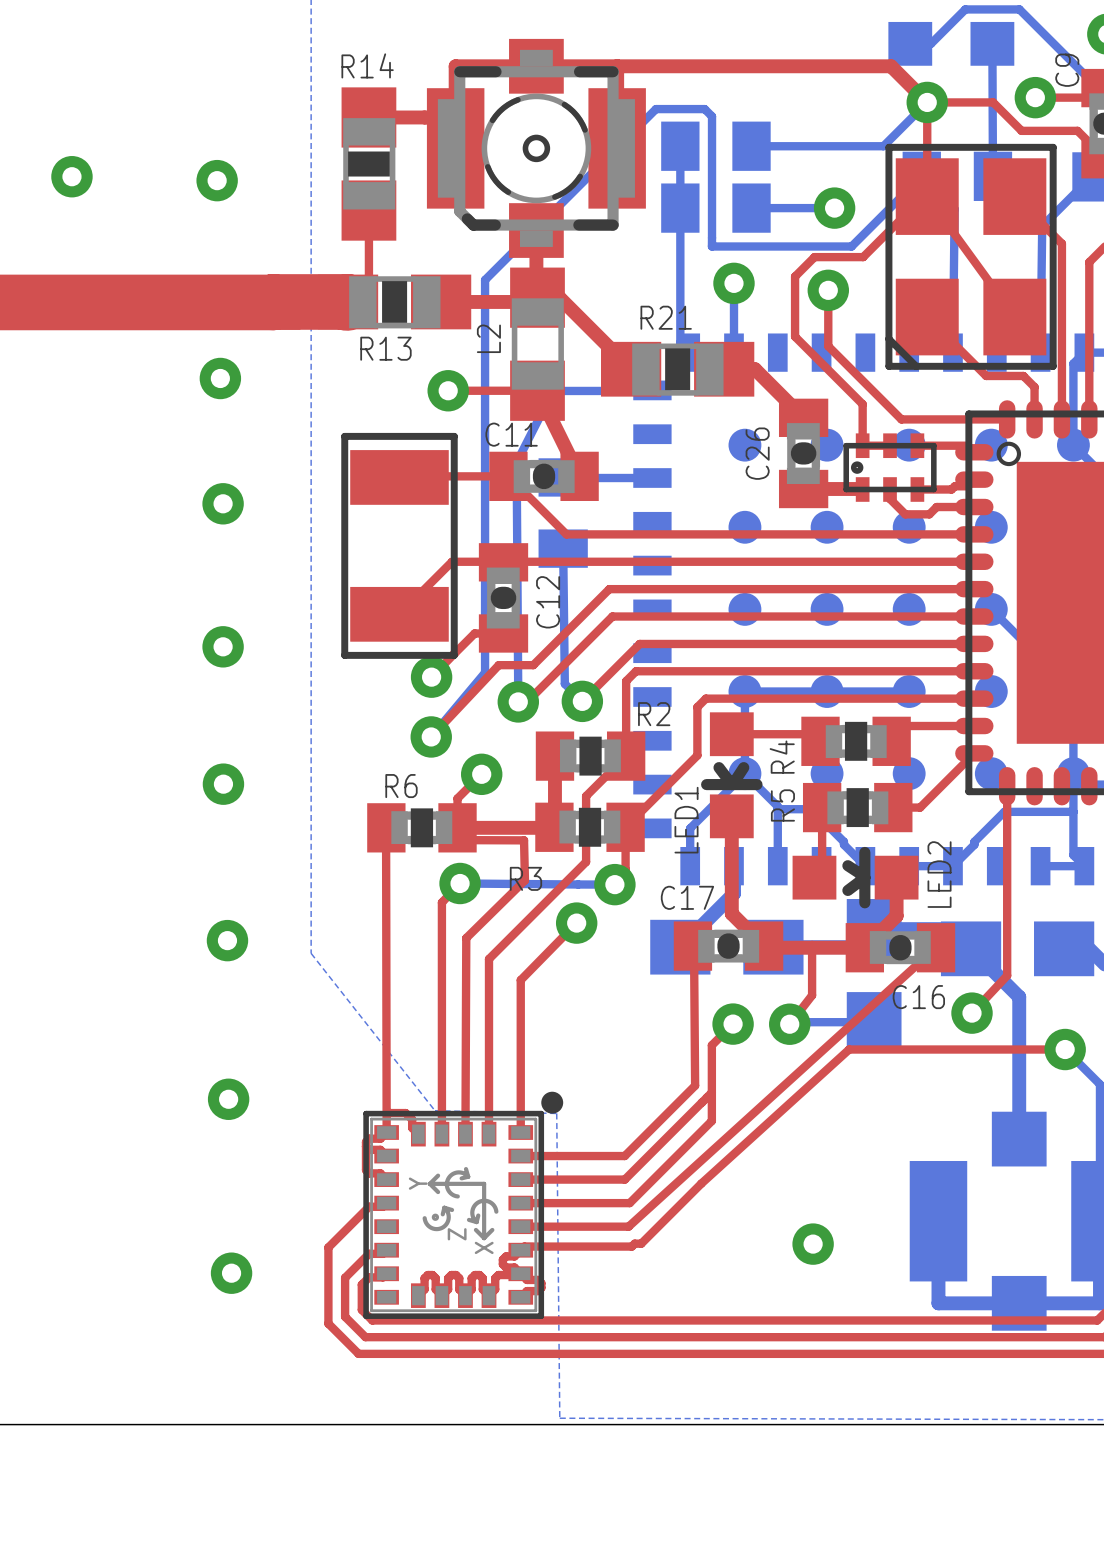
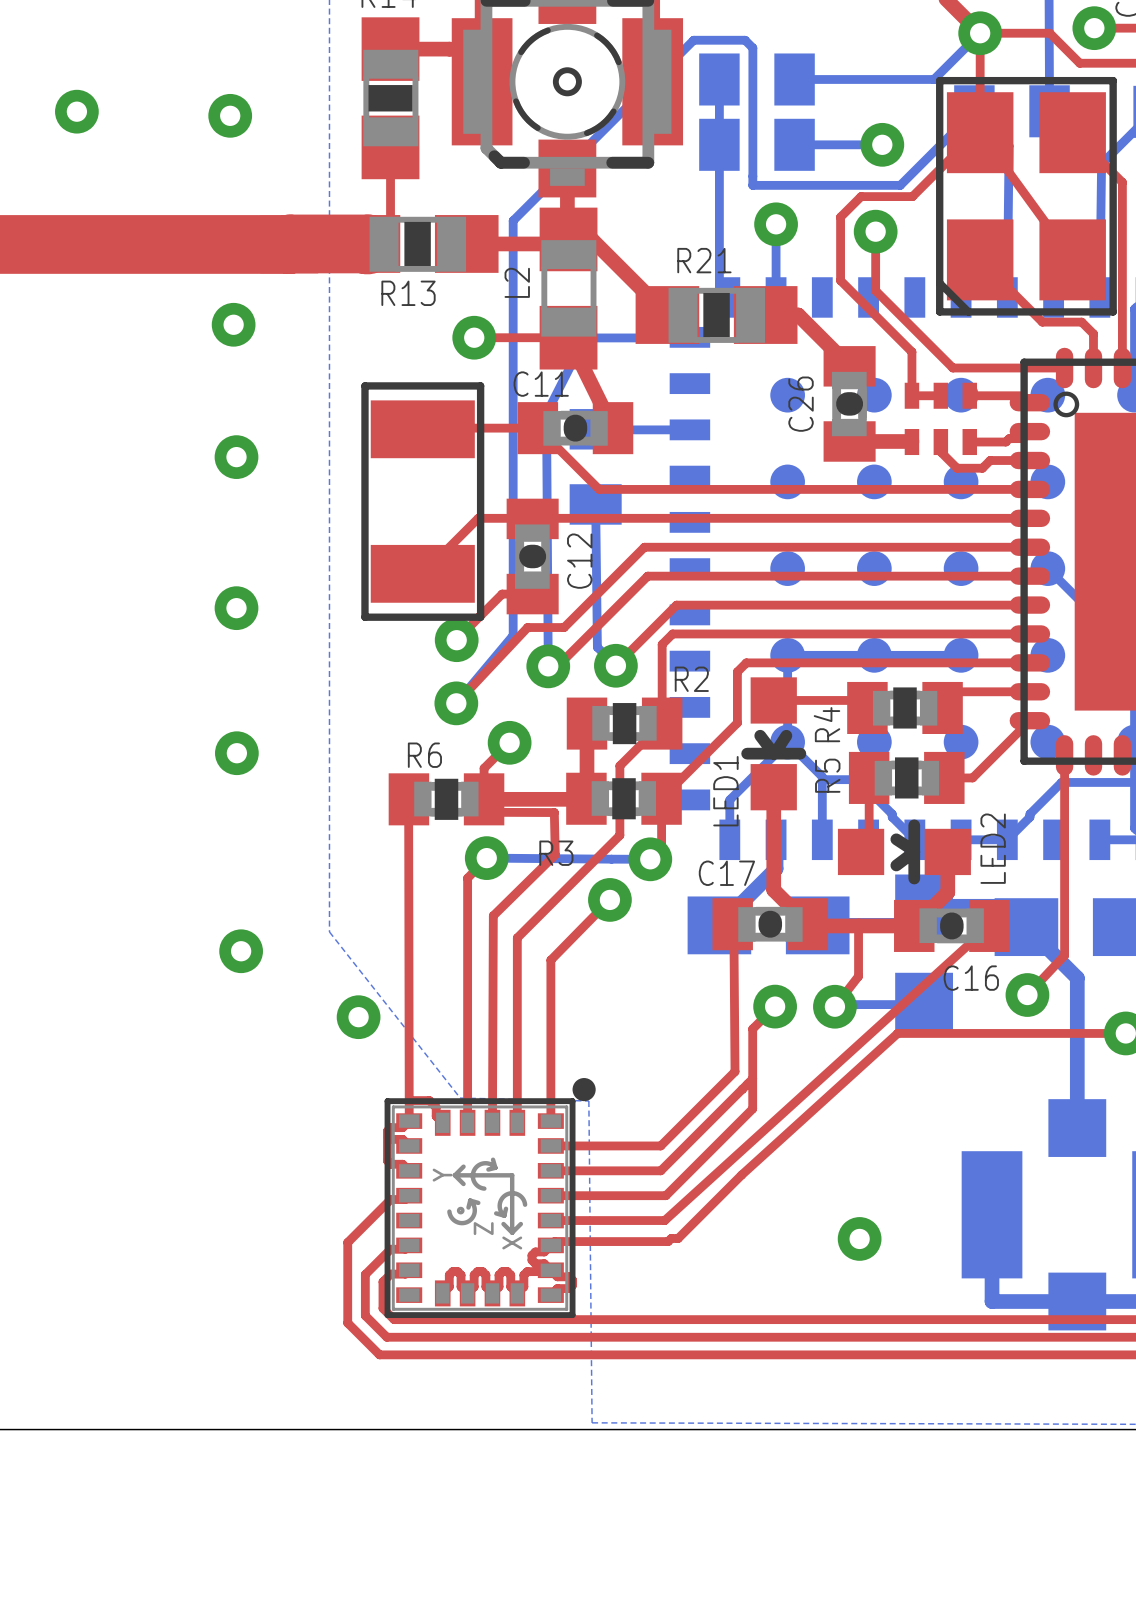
part footprint: [843, 433, 937, 502] -> [904, 382, 977, 456]
via position: (227, 940) -> (241, 951)
via: none -> (358, 1017)
via: (228, 1099) -> none
via: (231, 1273) -> none

